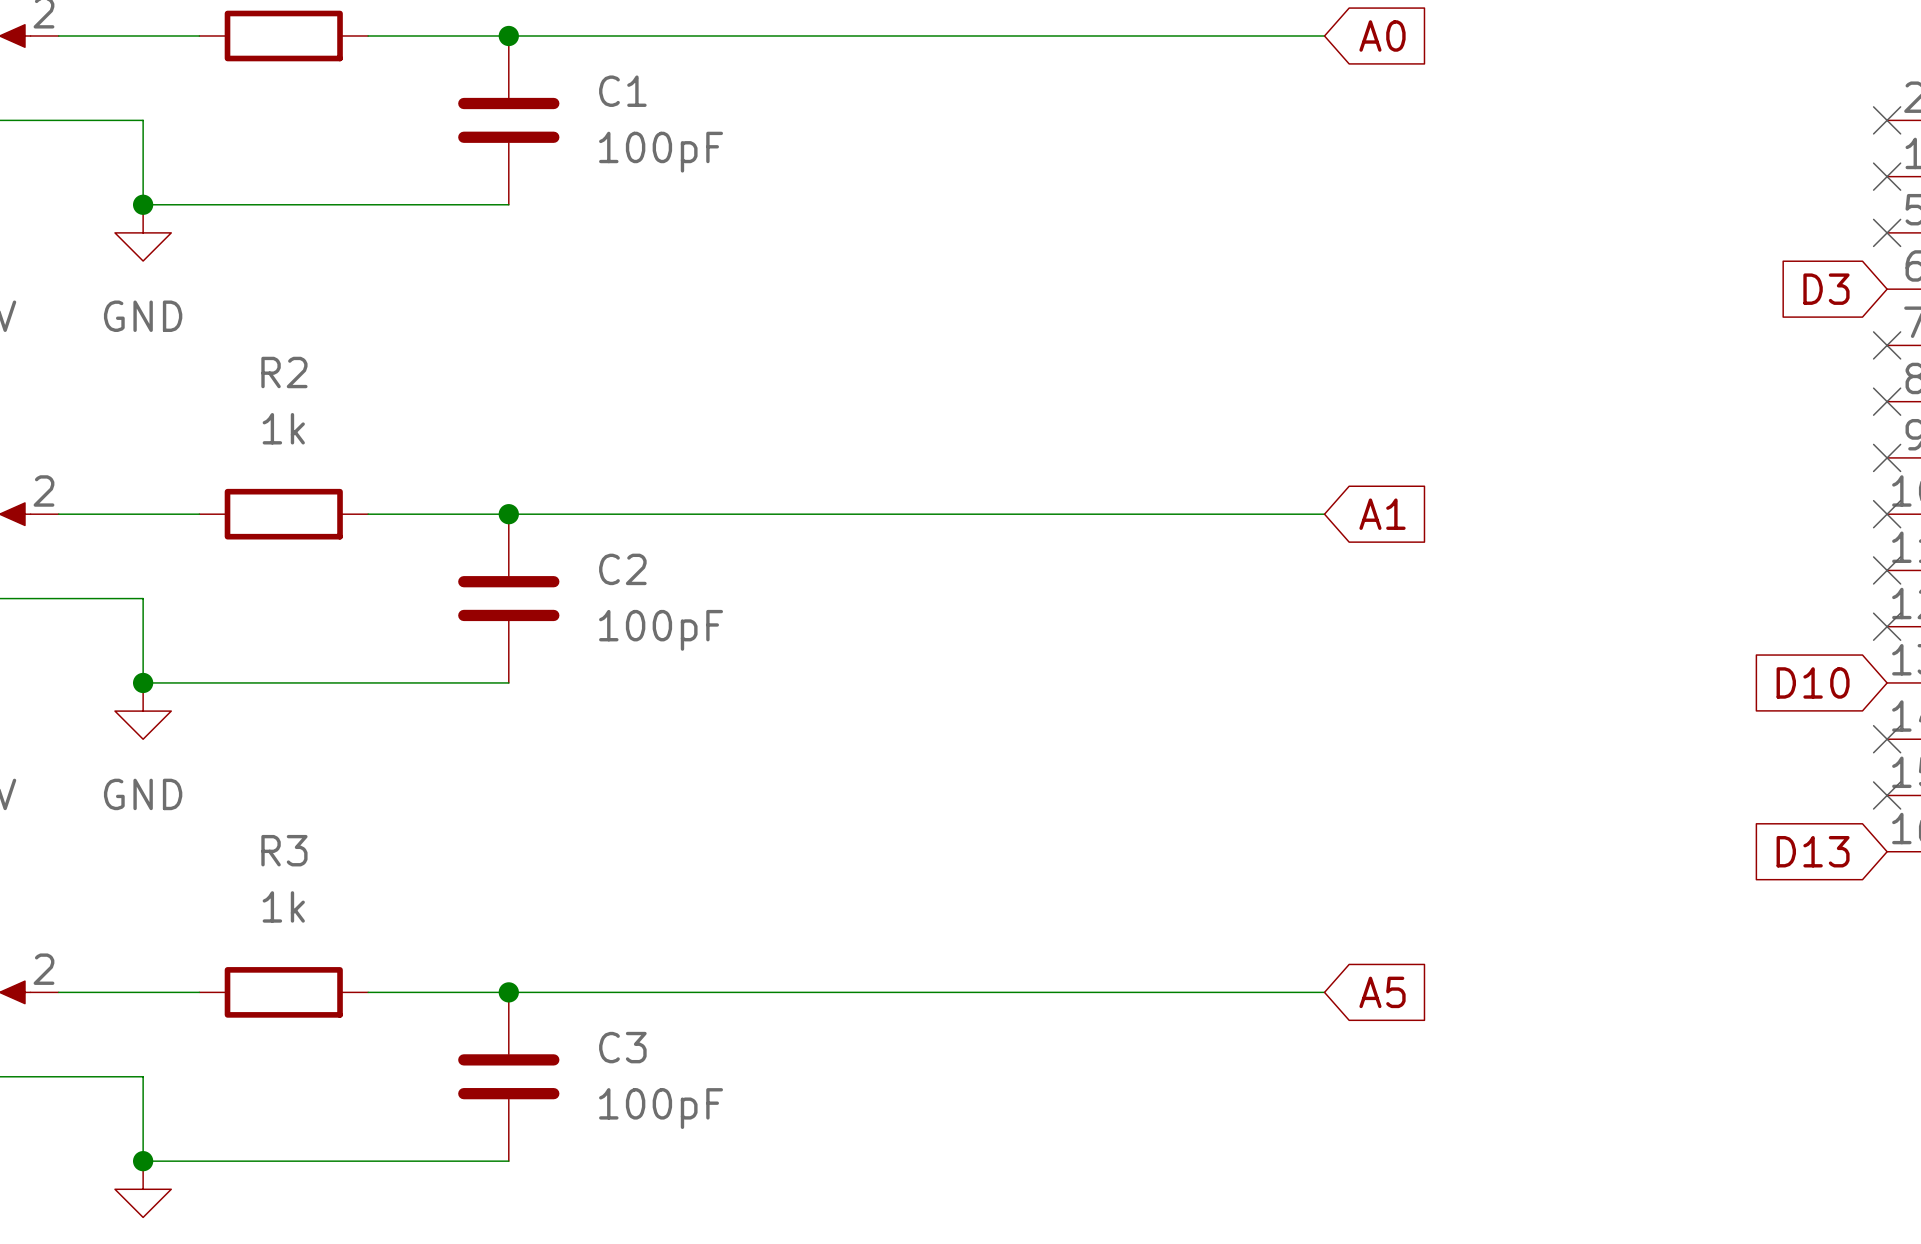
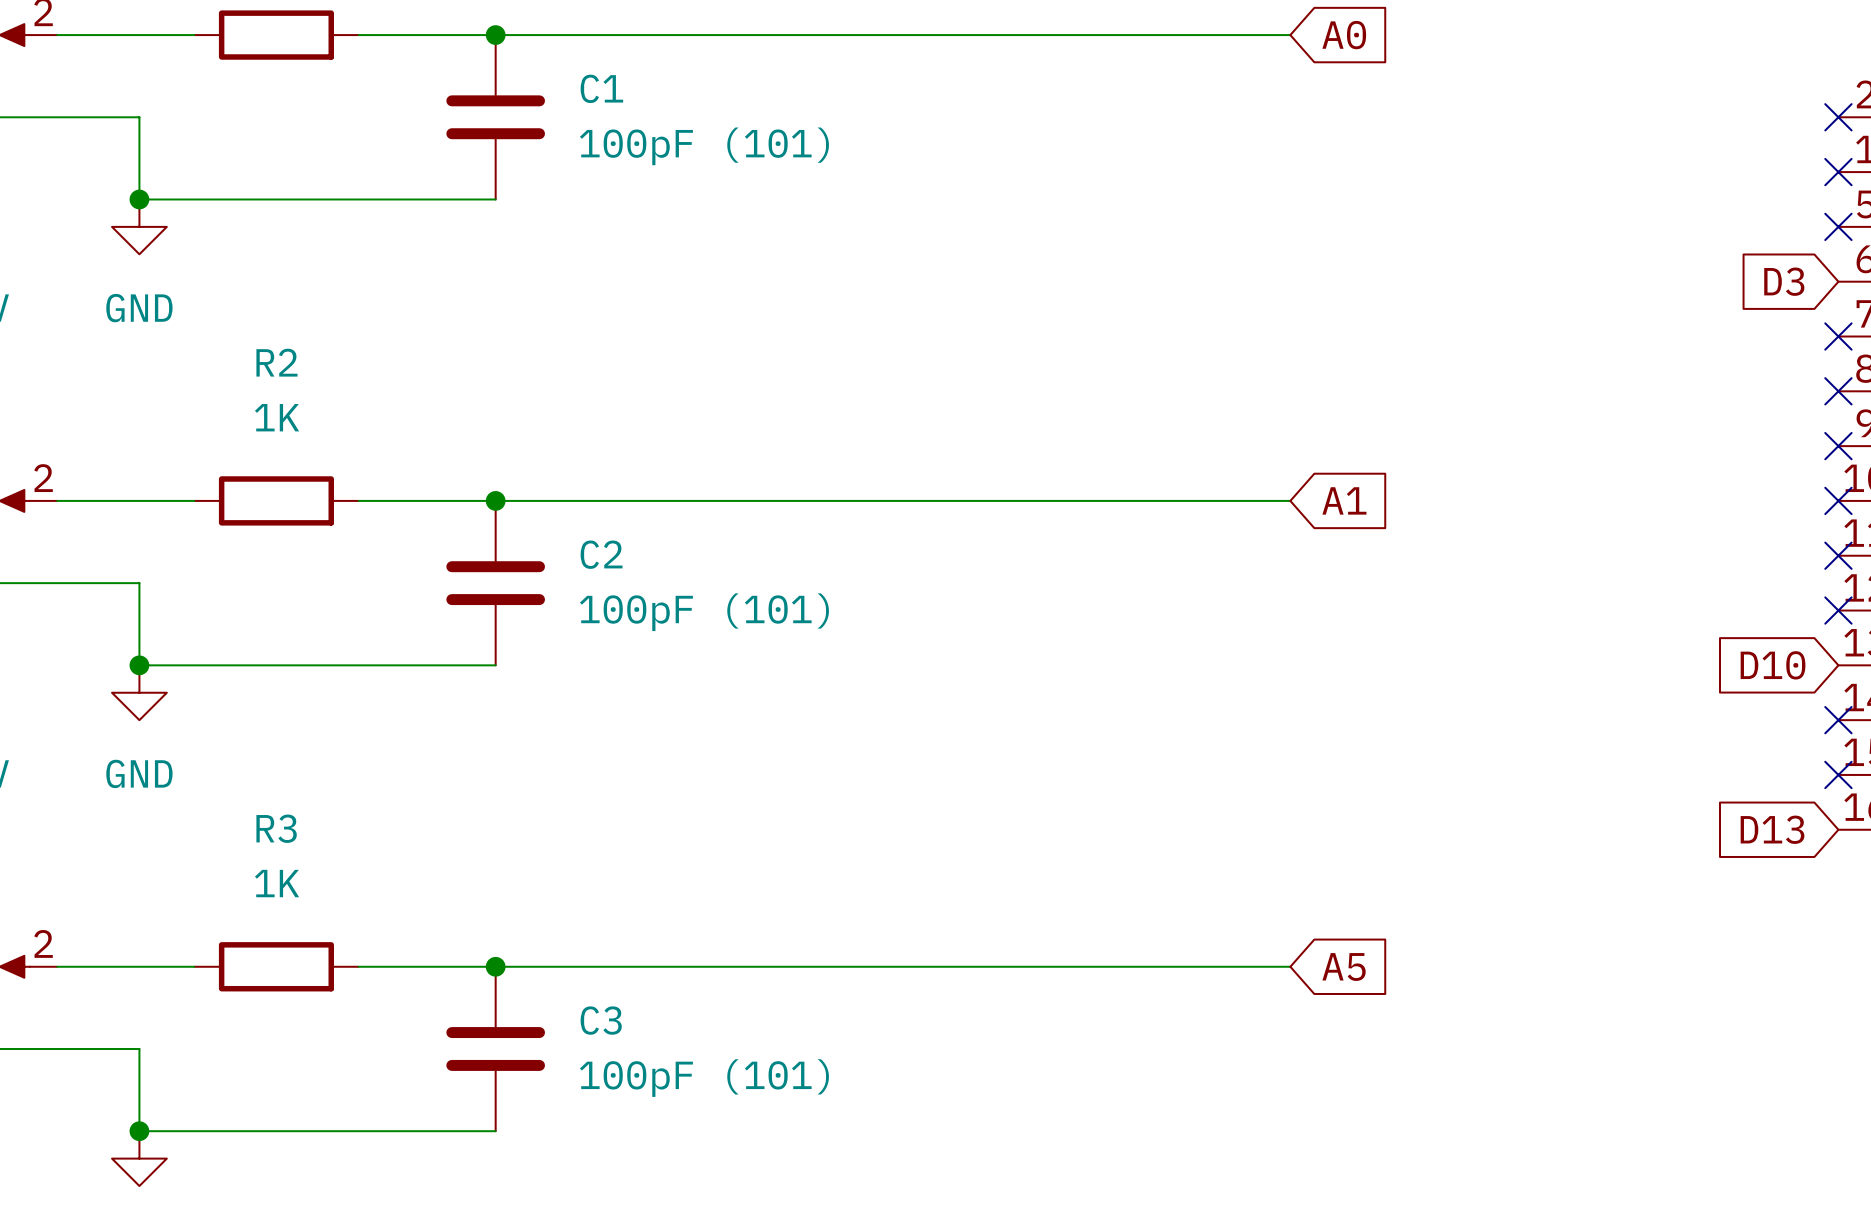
C1 value: 100pF (661, 152) -> 100pF (101) (704, 146)
R2 value: 1k (283, 428) -> 1K (277, 417)
C2 value: 100pF (661, 630) -> 100pF (101) (704, 612)
R3 value: 1k (283, 906) -> 1K (277, 883)
C3 value: 100pF (661, 1108) -> 100pF (101) (704, 1078)

